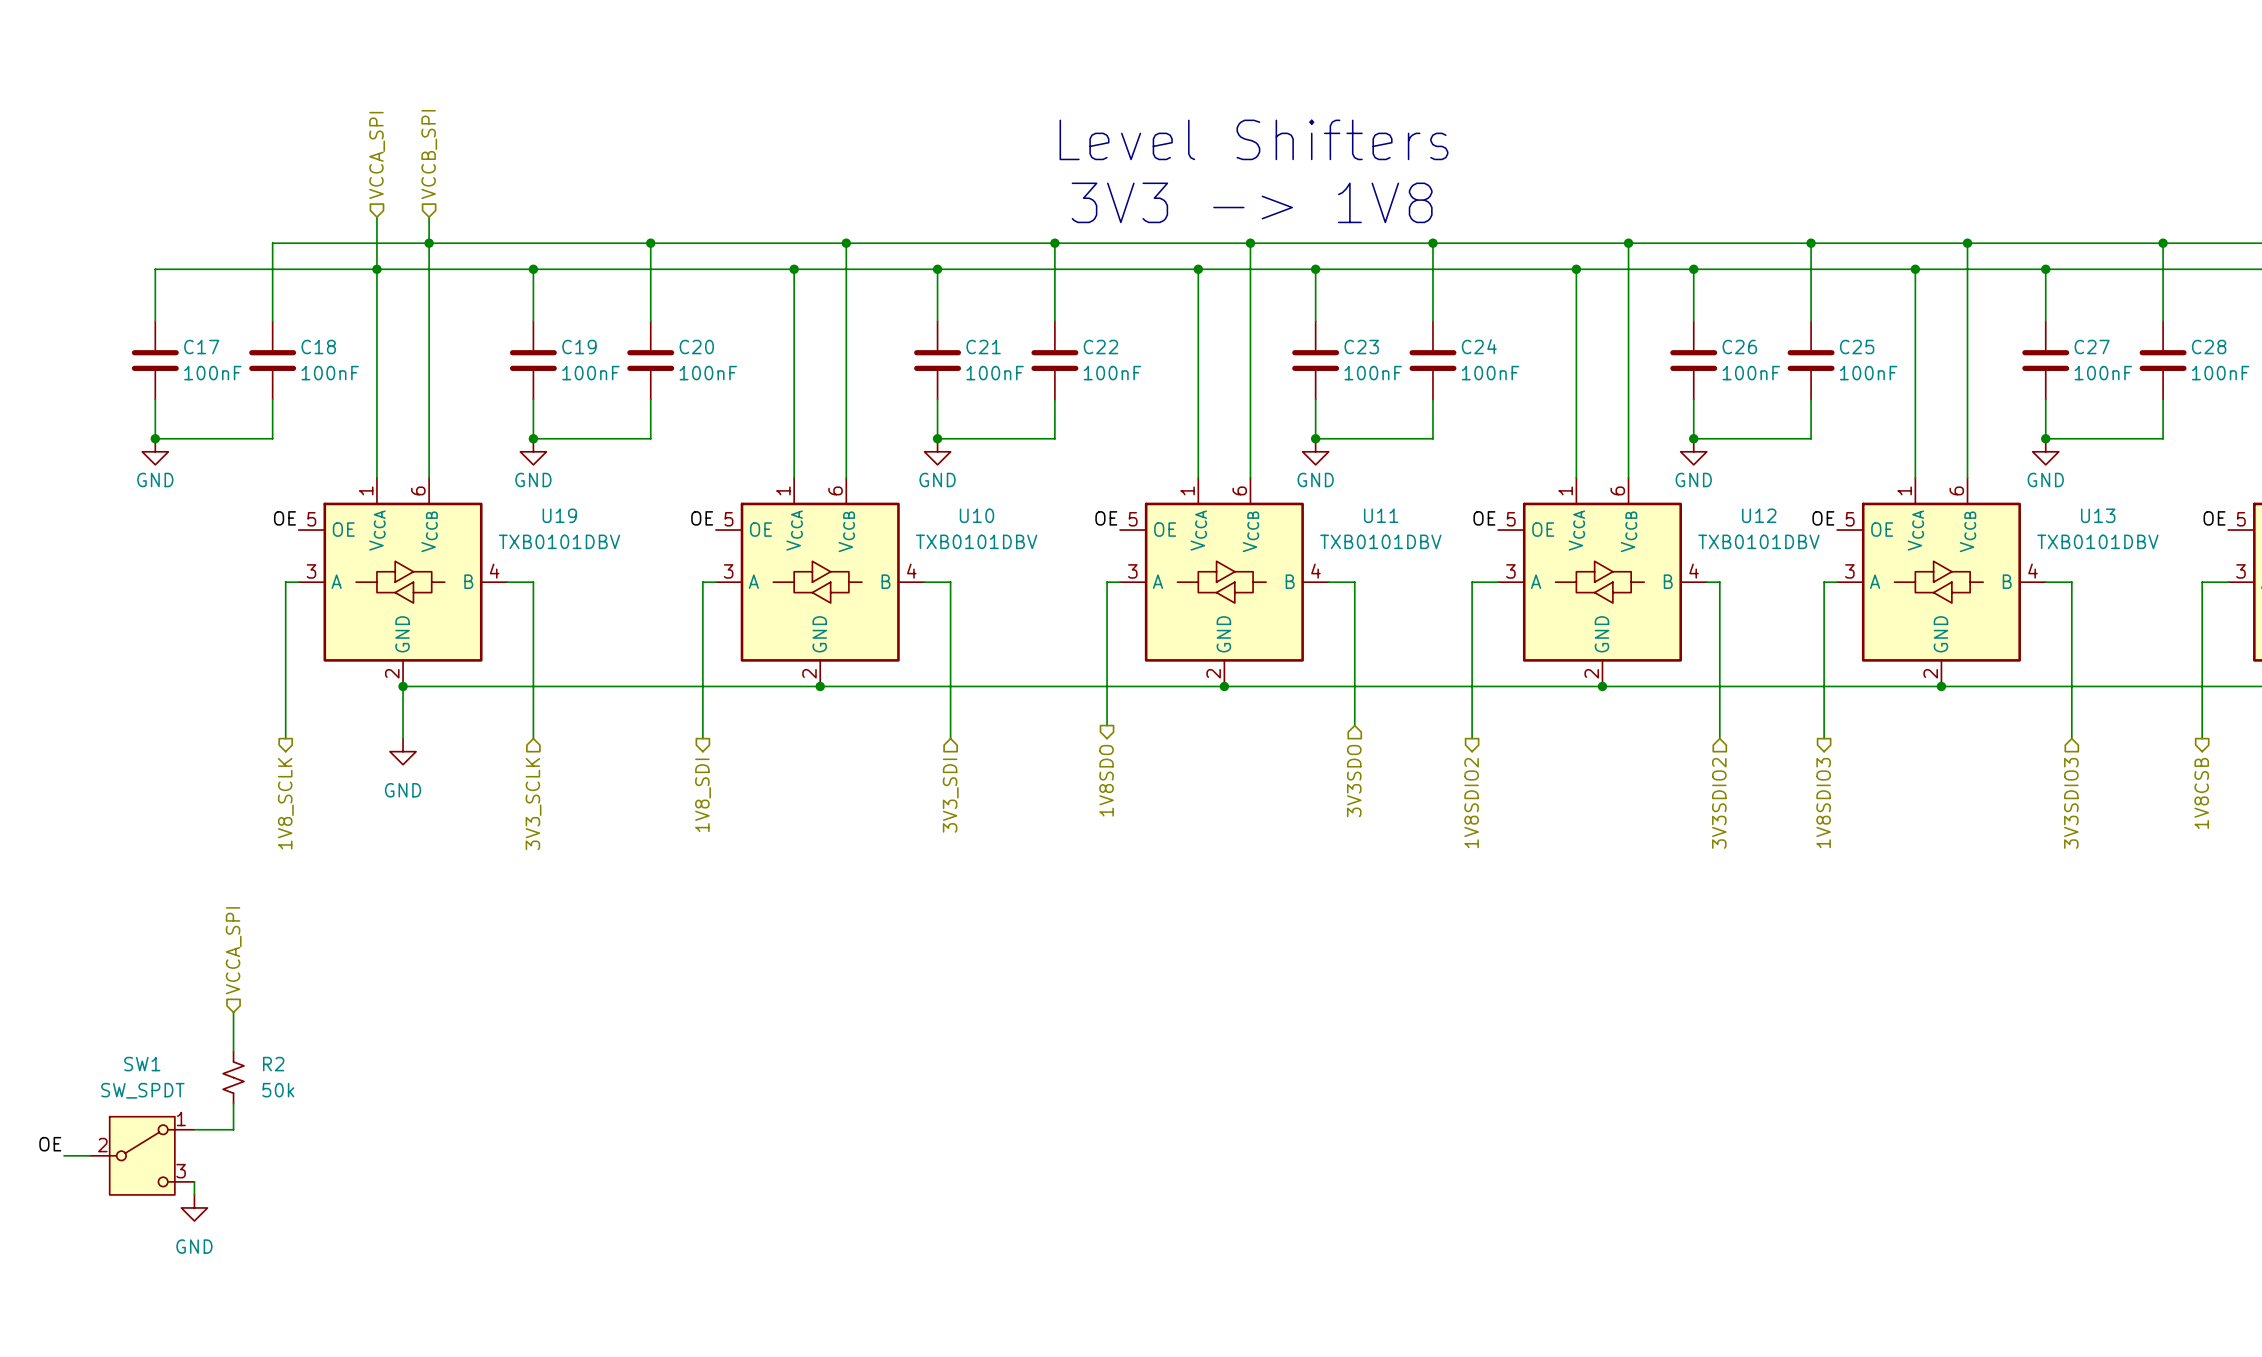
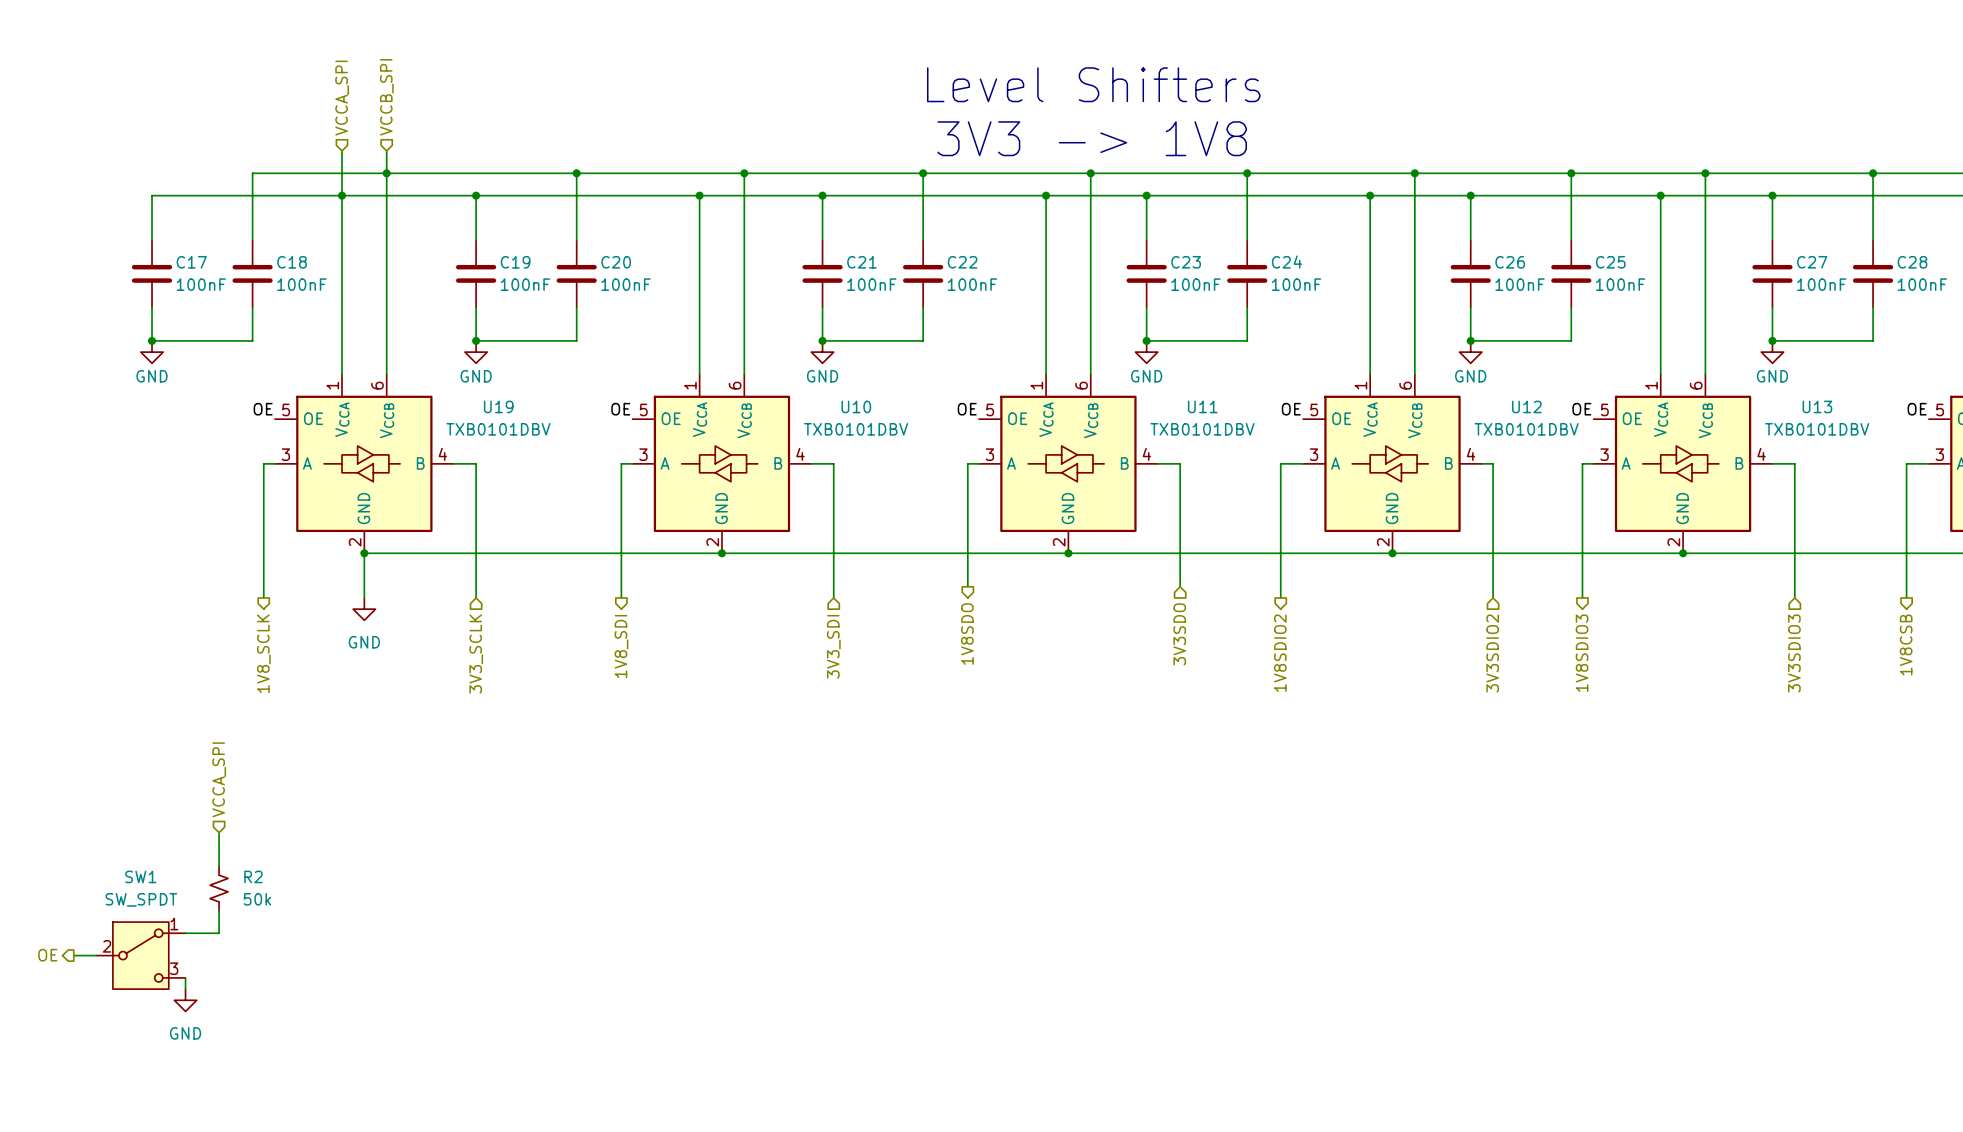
label: OE (50, 1144) -> none
hierarchical label: none -> OE (47, 955)

